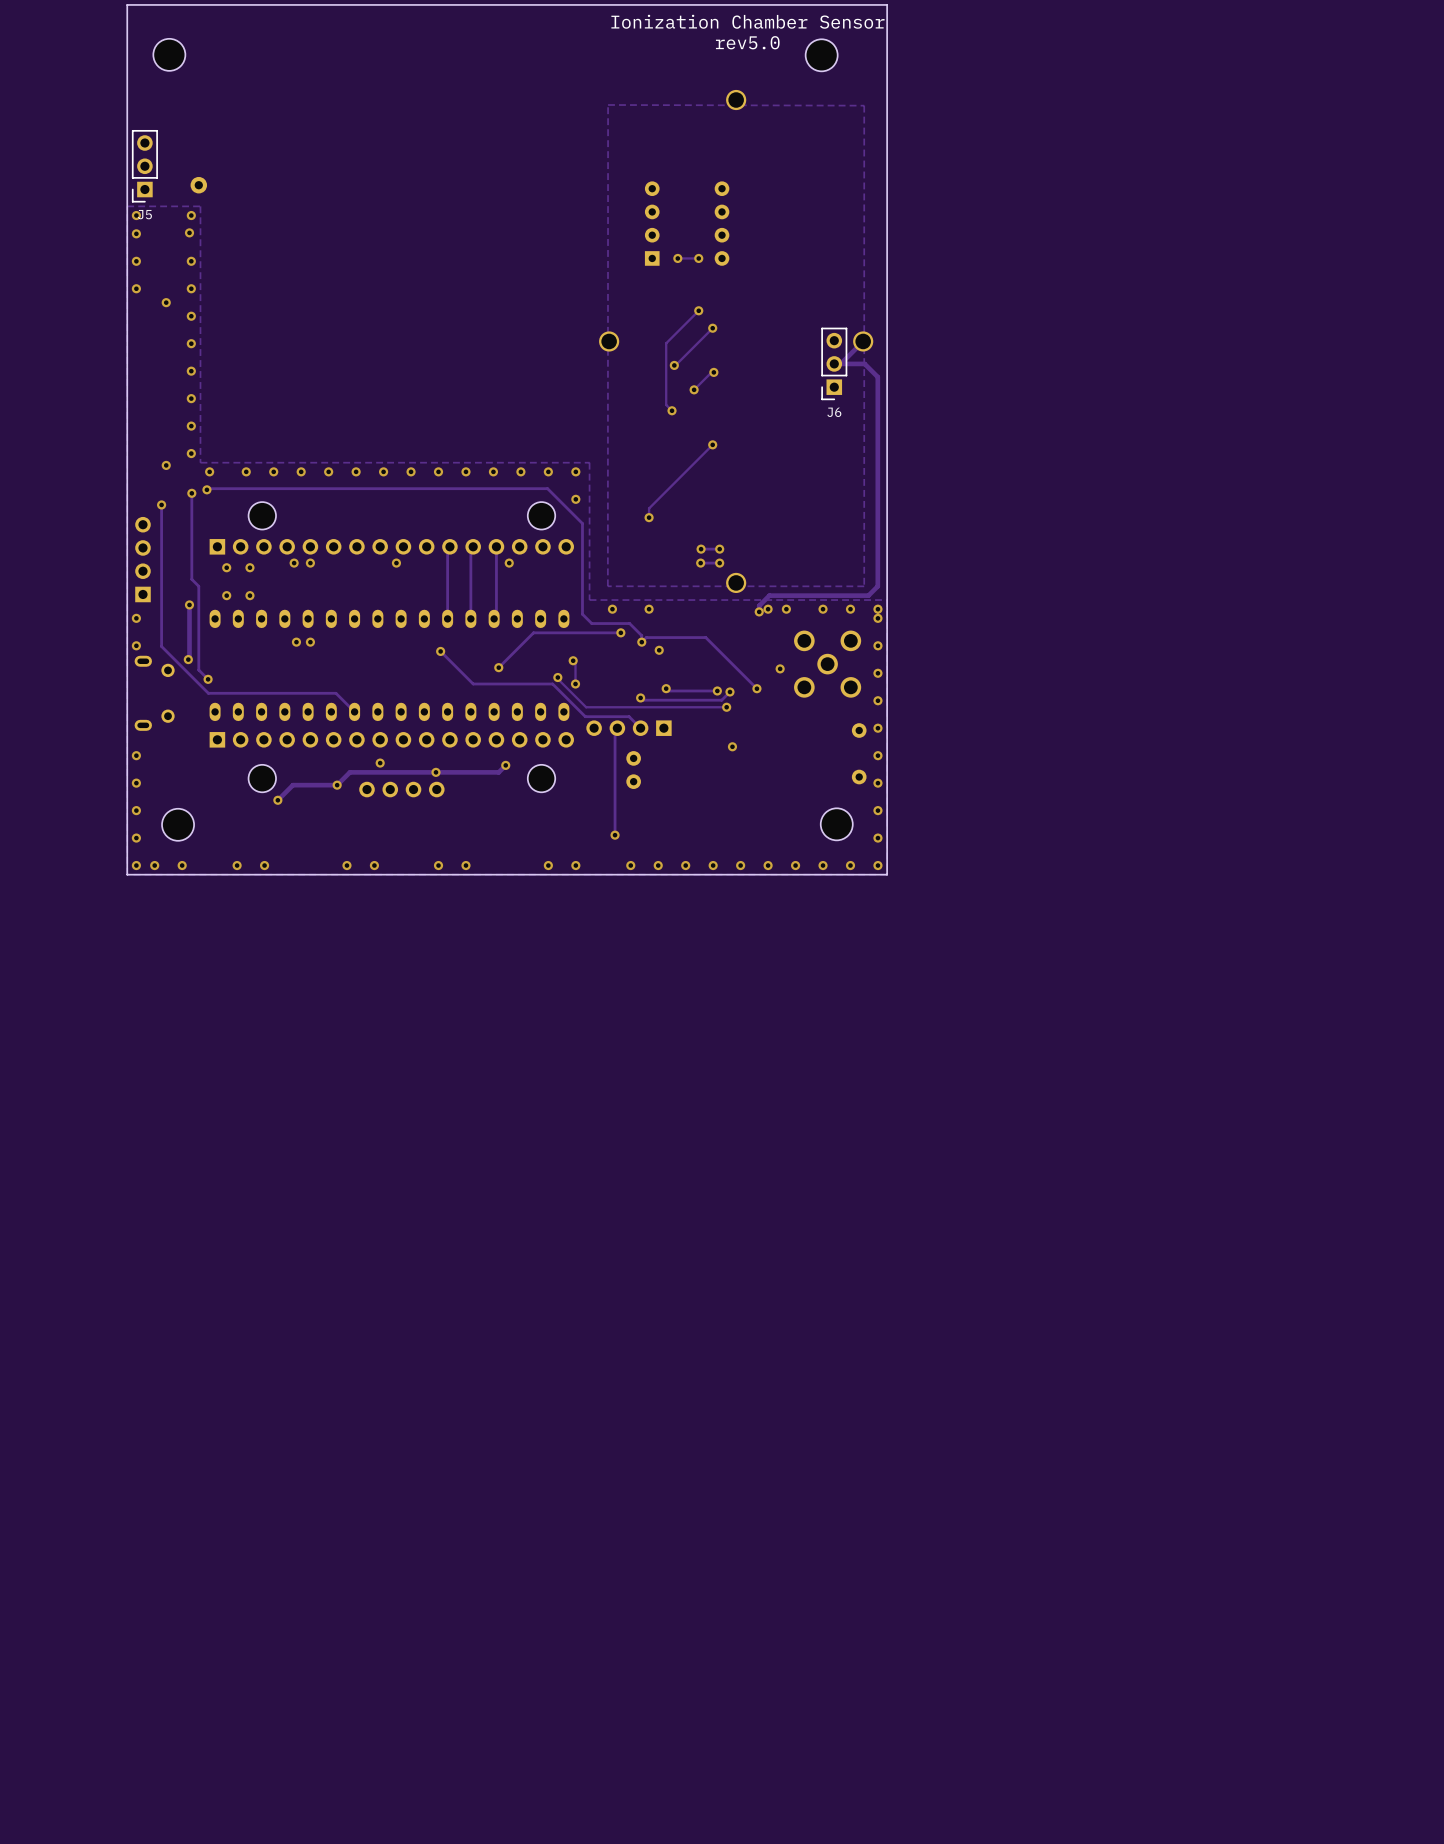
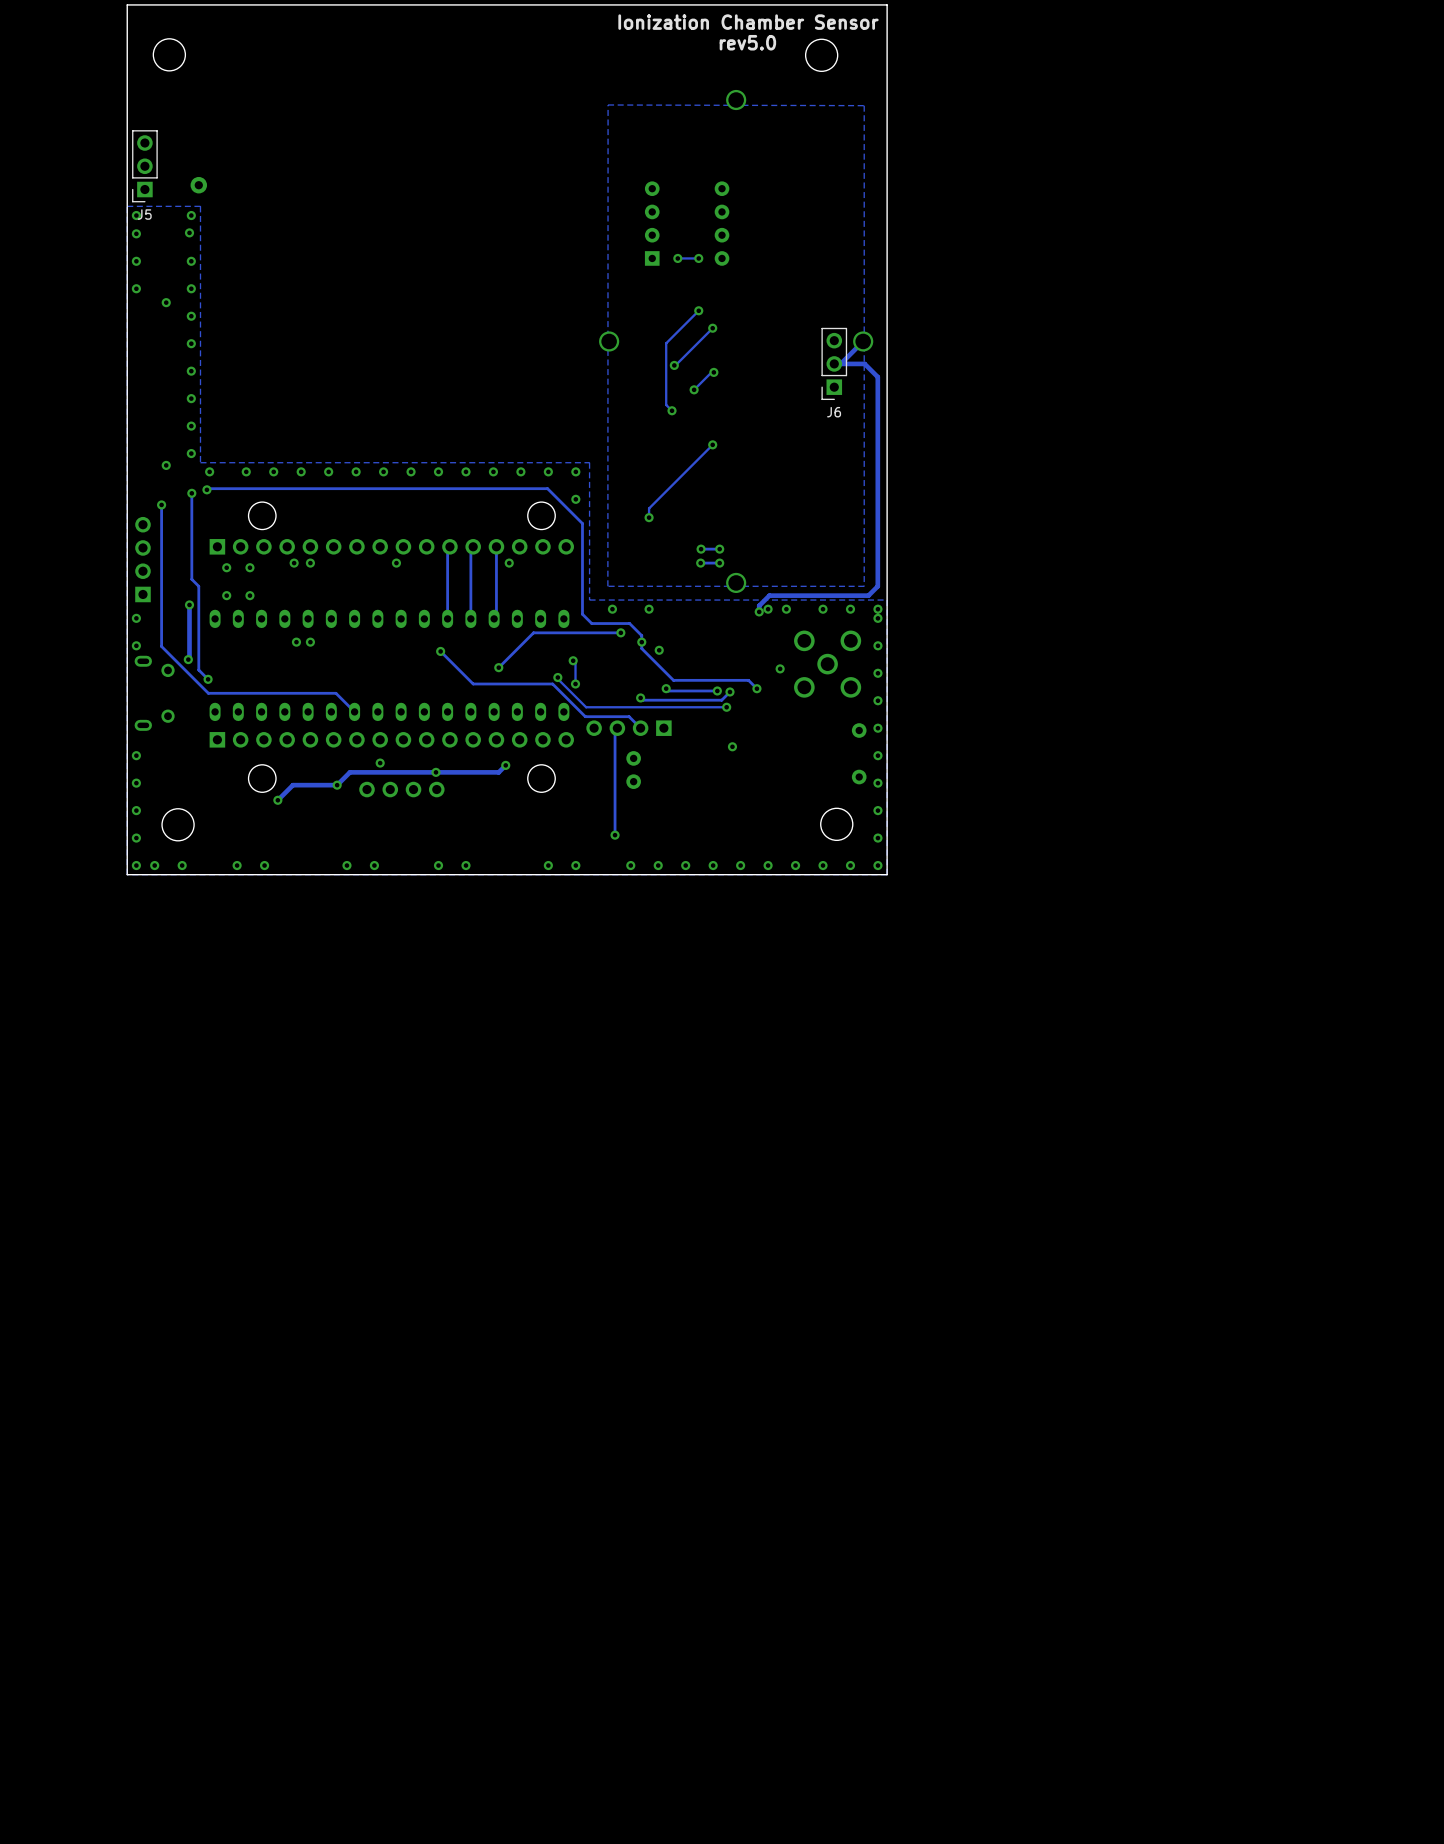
track: (641, 642) (646, 637) (705, 637) (748, 680) -> (641, 642) (641, 648) (673, 680) (748, 680)

